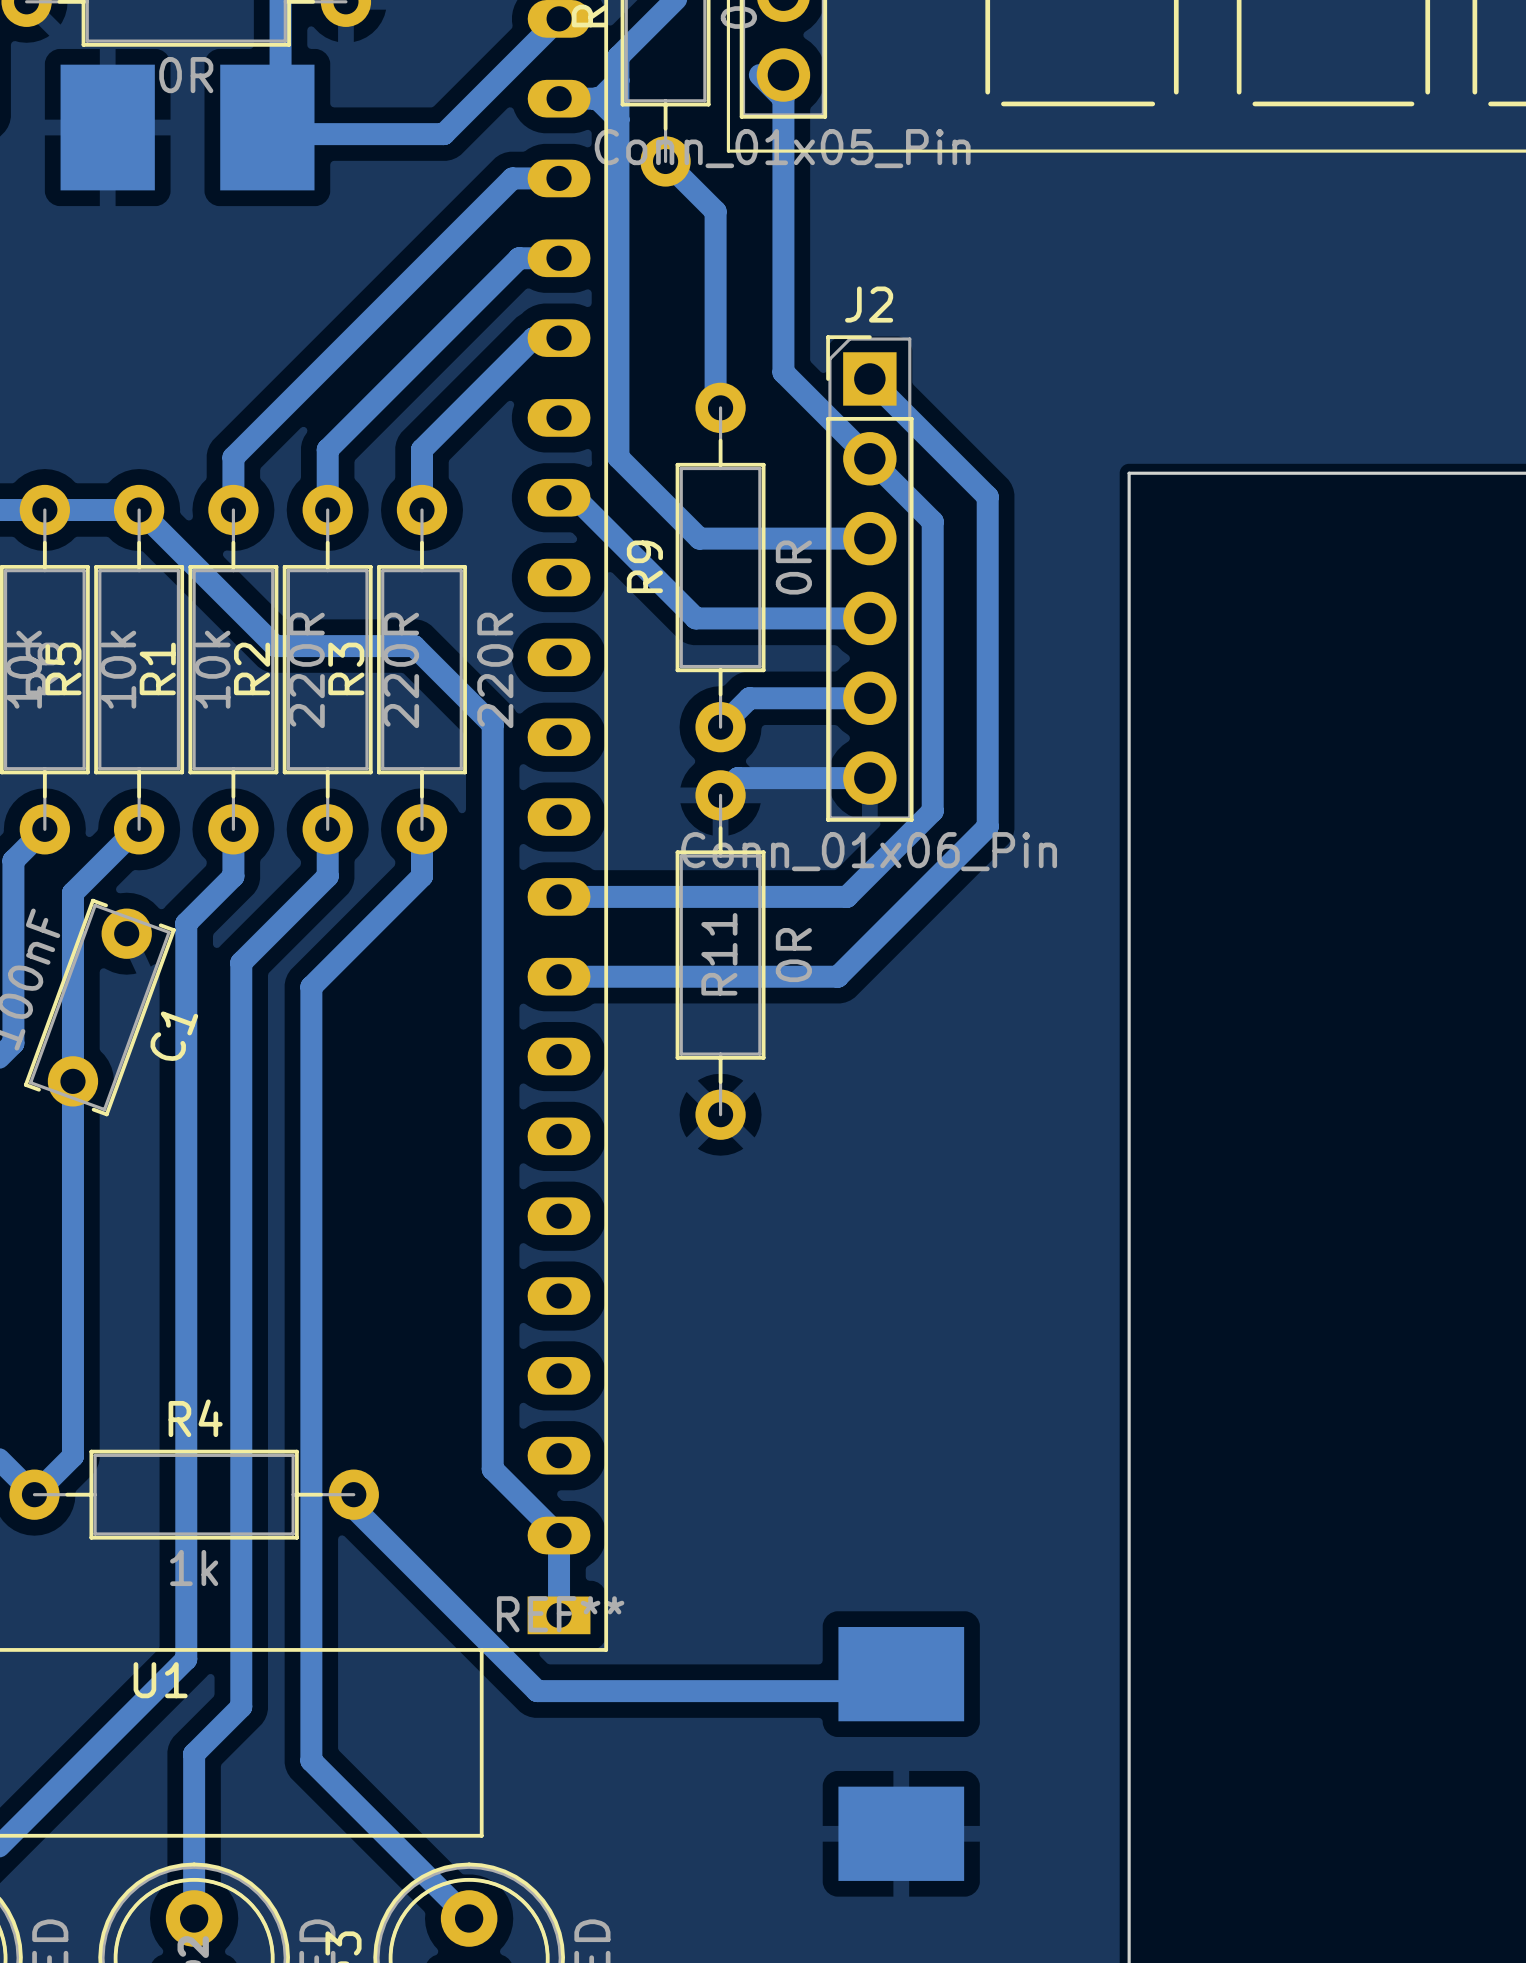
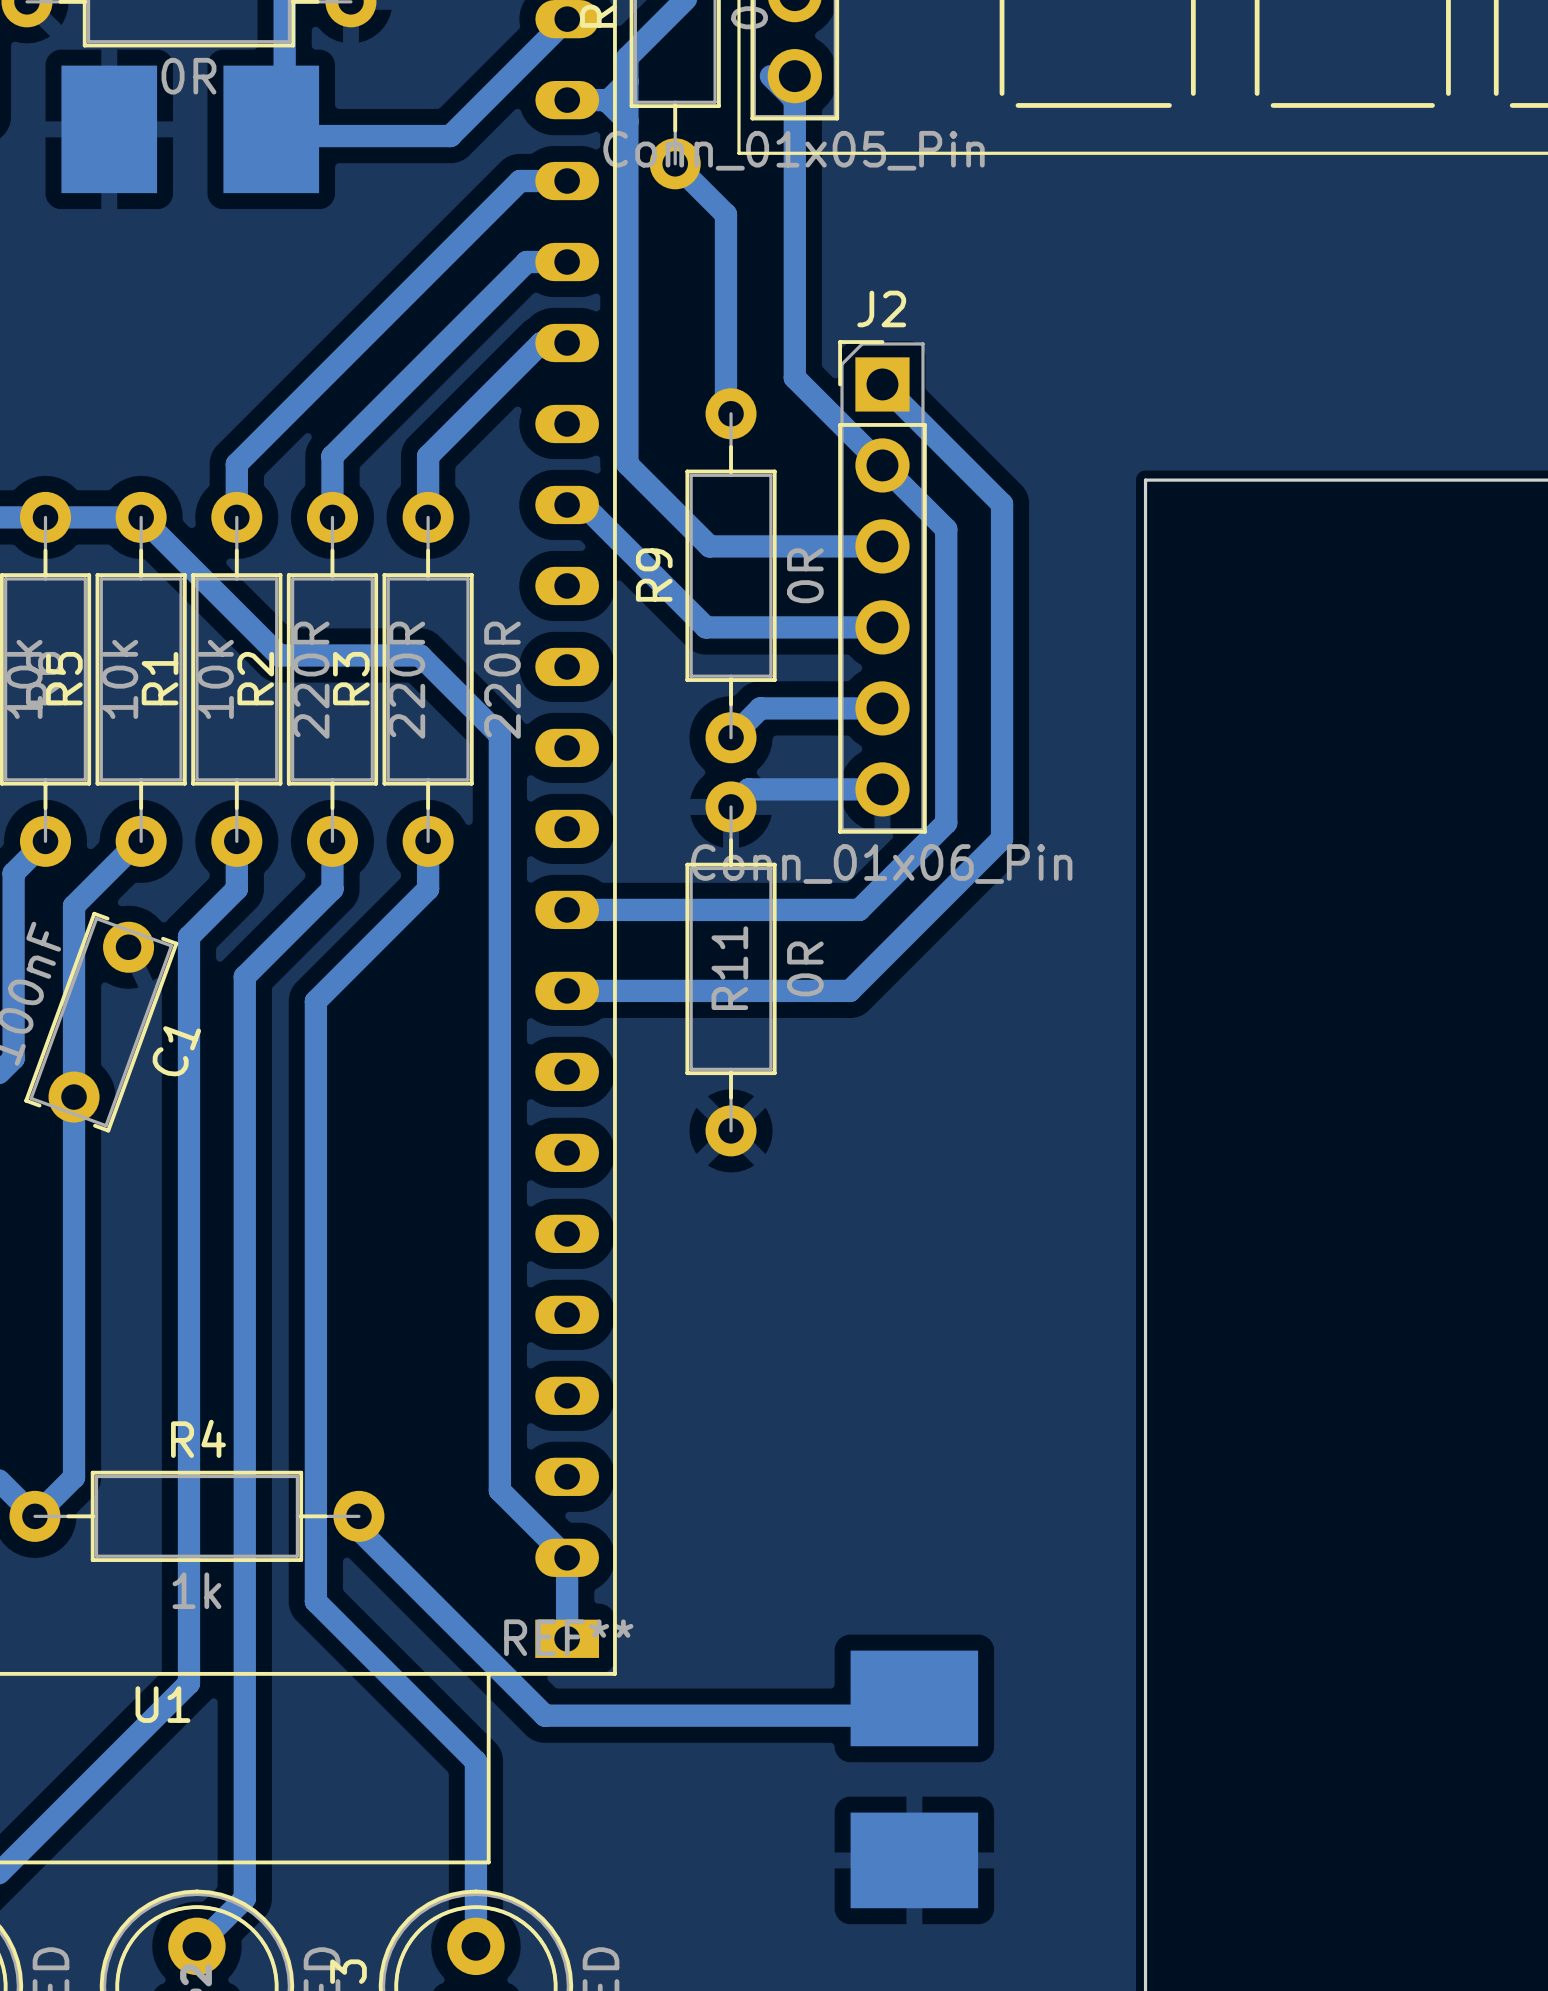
bottom track: (311, 1578) (311, 1760) (469, 1918) -> (315, 1601) (475, 1761) (475, 1946)
bottom track: (241, 1706) (194, 1753) (194, 1918) -> (244, 1731) (244, 1898) (196, 1946)

